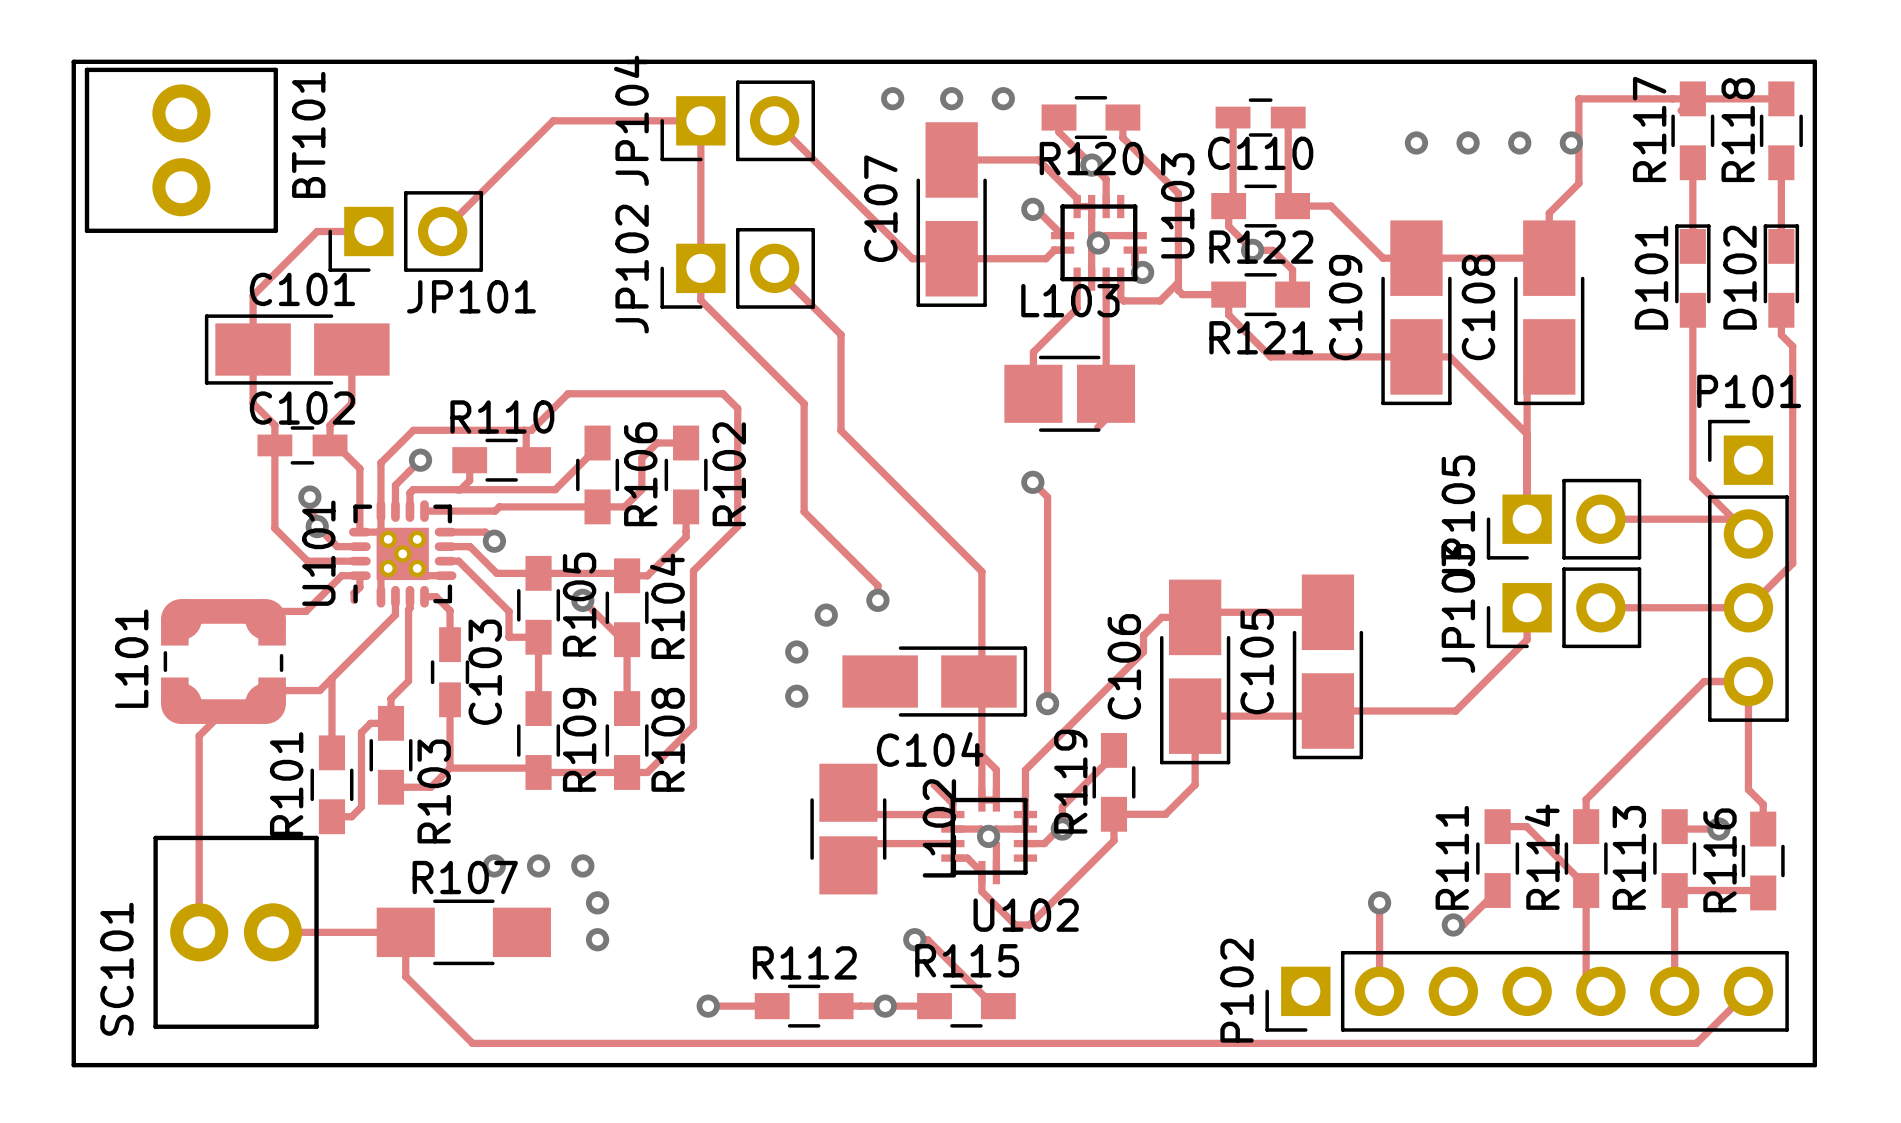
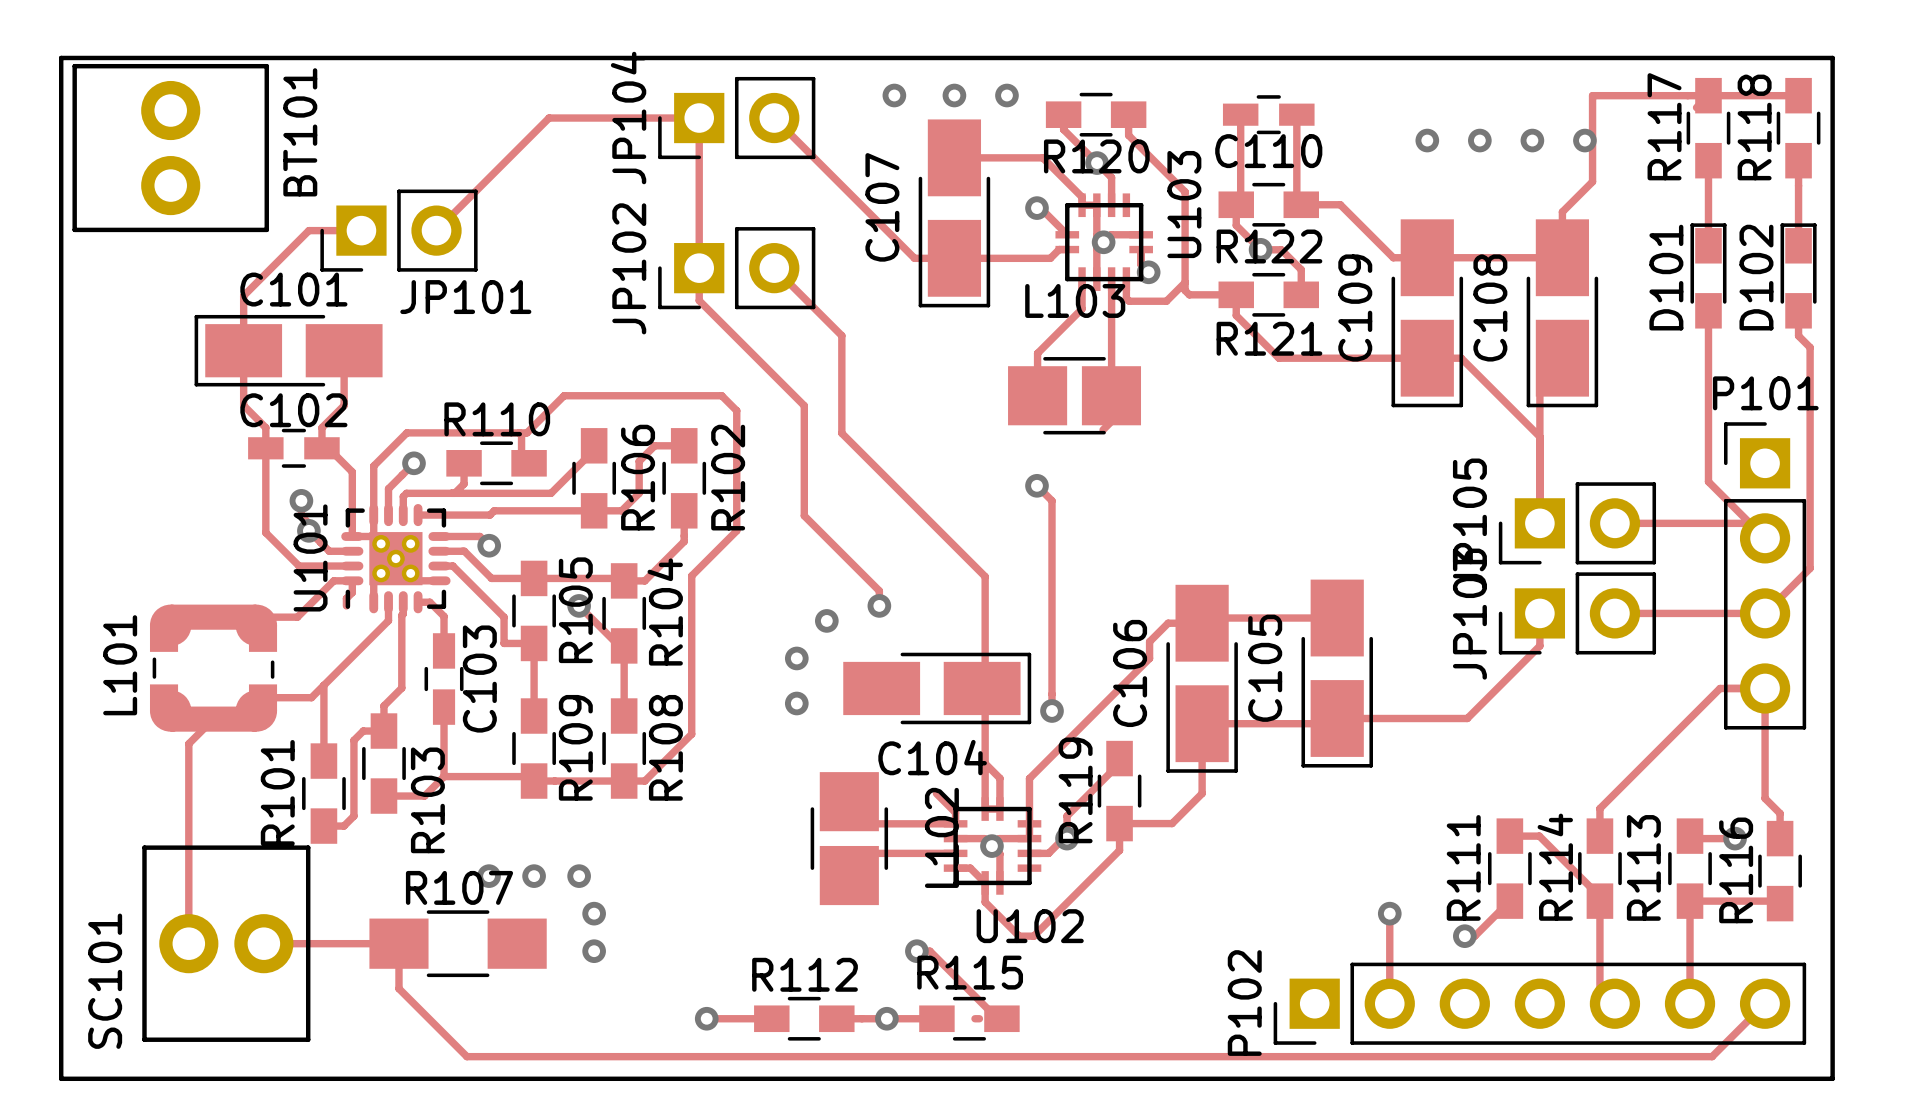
track: none -> (974, 1018) (979, 1018)

